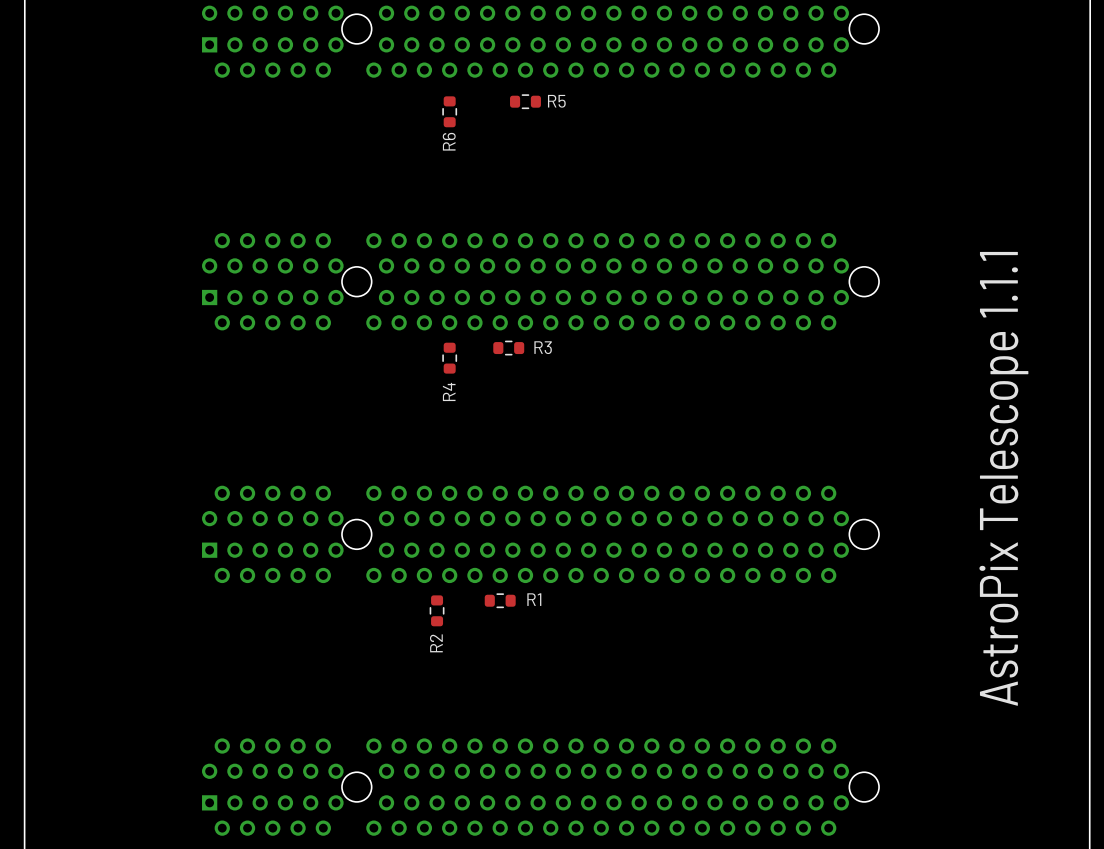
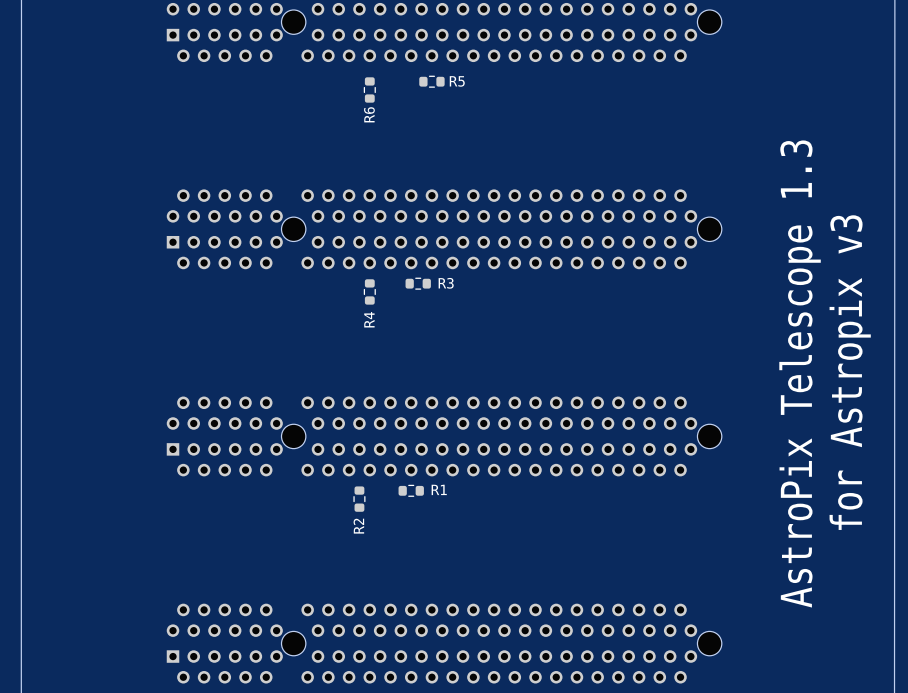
text: none -> for Astropix v3 (850, 372)
text: AstroPix Telescope 1.1.1 (1003, 478) -> AstroPix Telescope 1.3 (800, 373)

